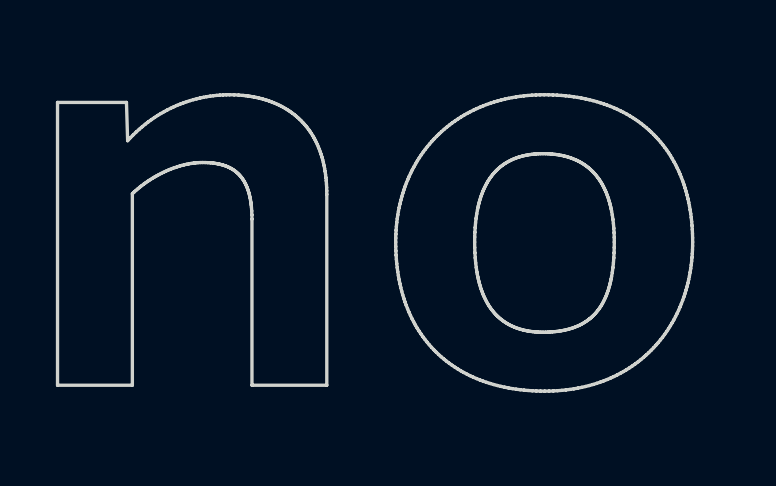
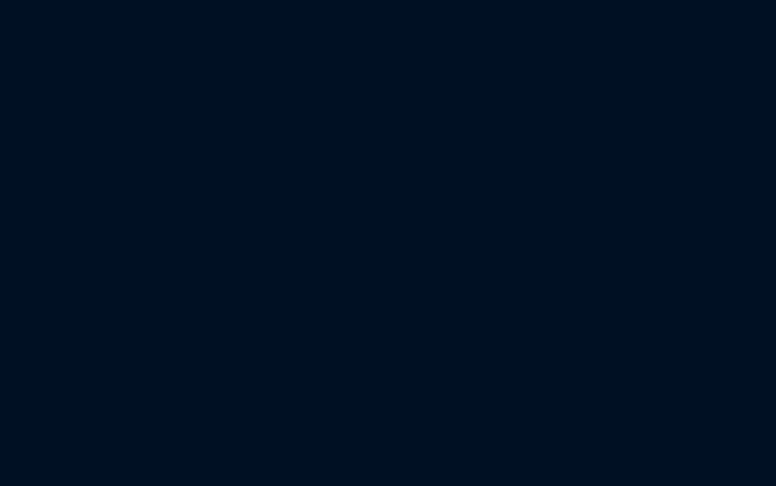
board edge: (223, 94) (256, 97) (285, 108) (305, 125) (320, 151) (325, 171) (326, 190) (326, 385) (251, 385) (251, 219) (249, 196) (243, 180) (234, 170) (221, 164) (202, 162) (184, 164) (165, 171) (147, 181) (132, 193) (132, 385) (57, 385) (57, 102) (126, 102) (127, 140) (148, 121) (170, 108) (196, 98) (223, 94) -> none
board edge: (535, 94) (565, 95) (596, 101) (623, 112) (646, 127) (664, 147) (678, 171) (687, 198) (692, 225) (692, 257) (686, 286) (675, 316) (660, 339) (640, 359) (617, 374) (589, 385) (561, 390) (528, 390) (497, 385) (469, 375) (446, 361) (427, 342) (411, 318) (401, 291) (396, 259) (396, 226) (401, 196) (412, 170) (429, 144) (452, 122) (476, 108) (504, 99) (535, 94) -> none
board edge: (538, 153) (521, 156) (508, 161) (497, 169) (488, 180) (481, 195) (476, 213) (475, 257) (482, 292) (497, 315) (508, 324) (521, 329) (552, 331) (567, 329) (581, 324) (593, 315) (601, 304) (607, 290) (612, 272) (613, 228) (606, 193) (591, 170) (569, 157) (538, 153) -> none

